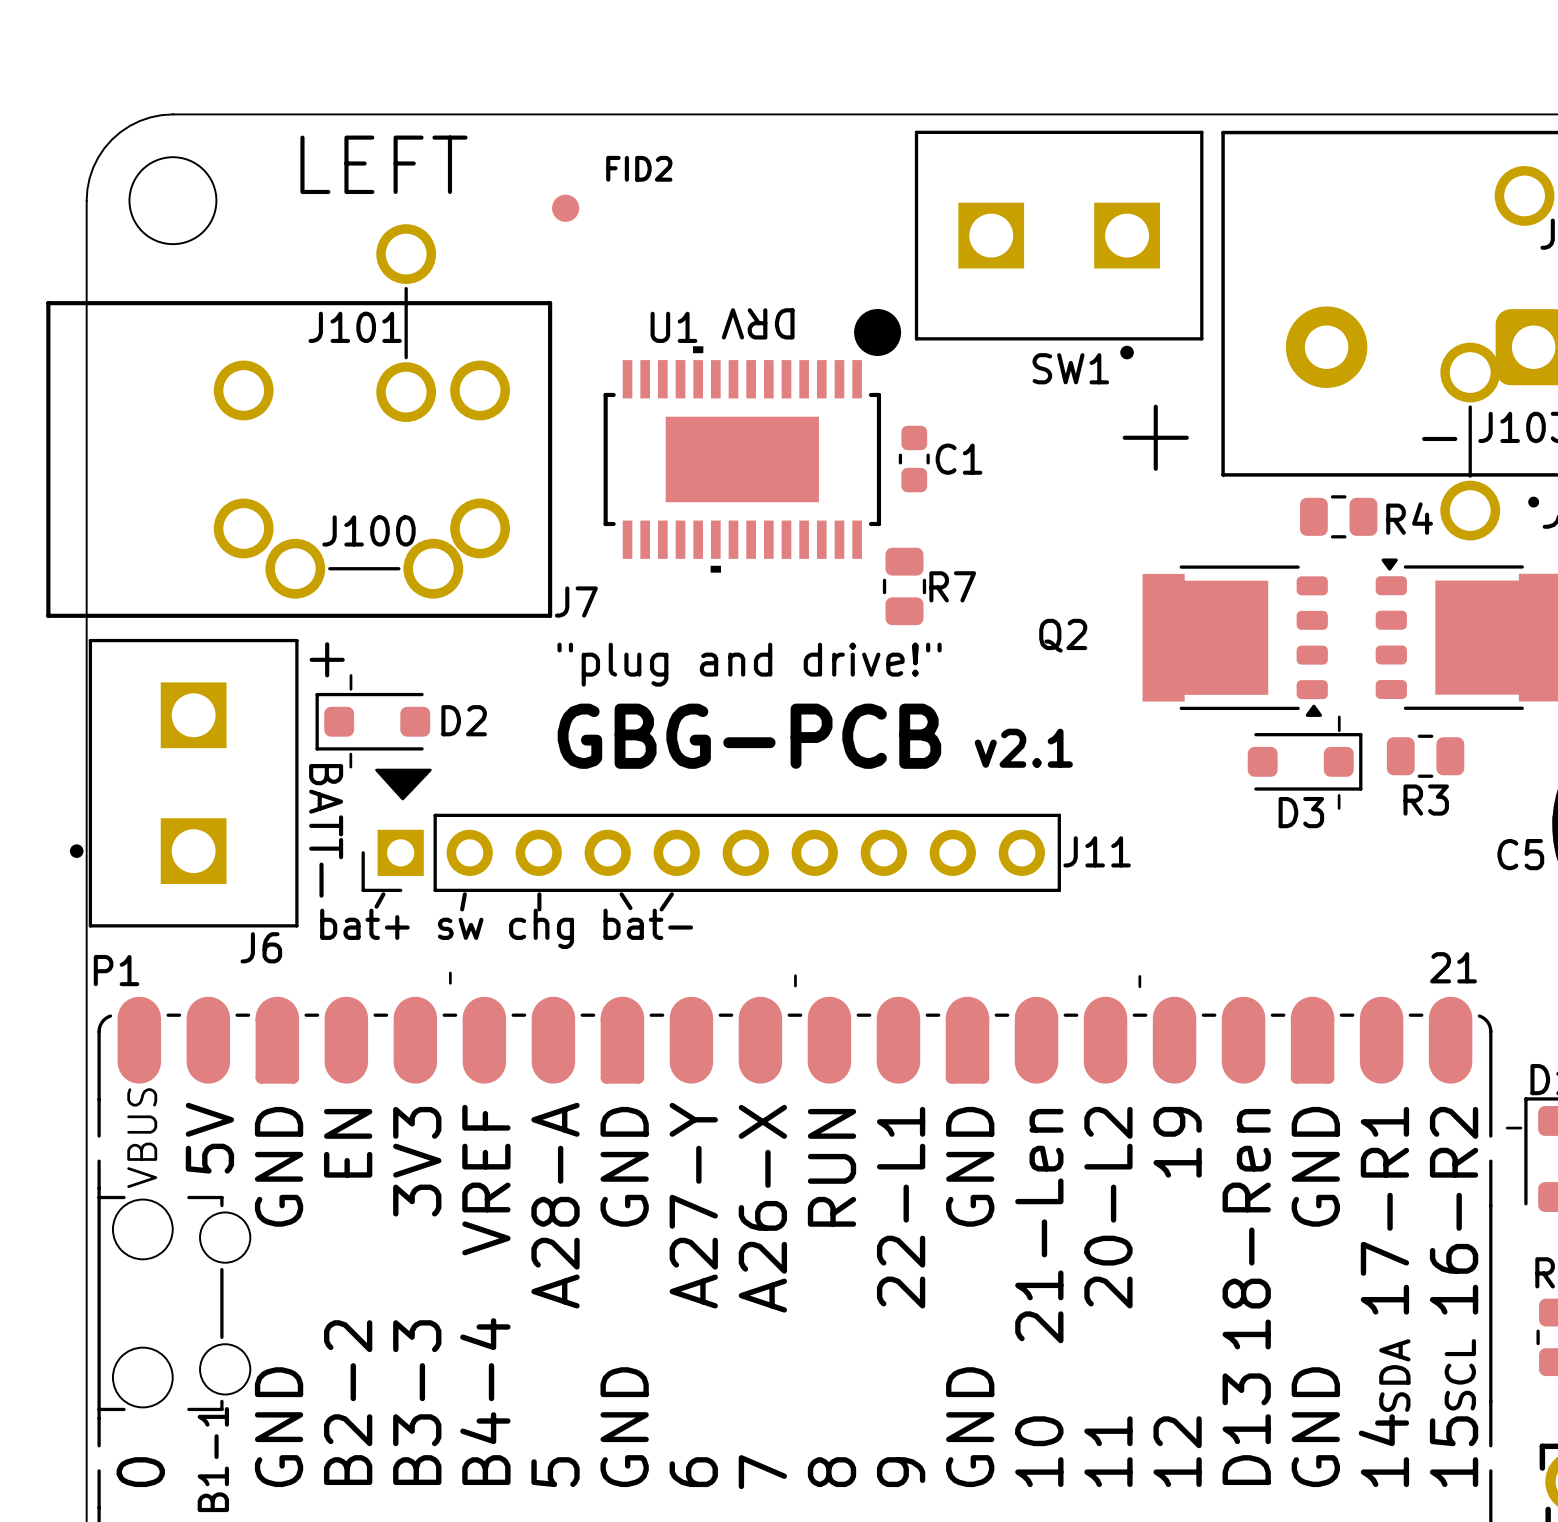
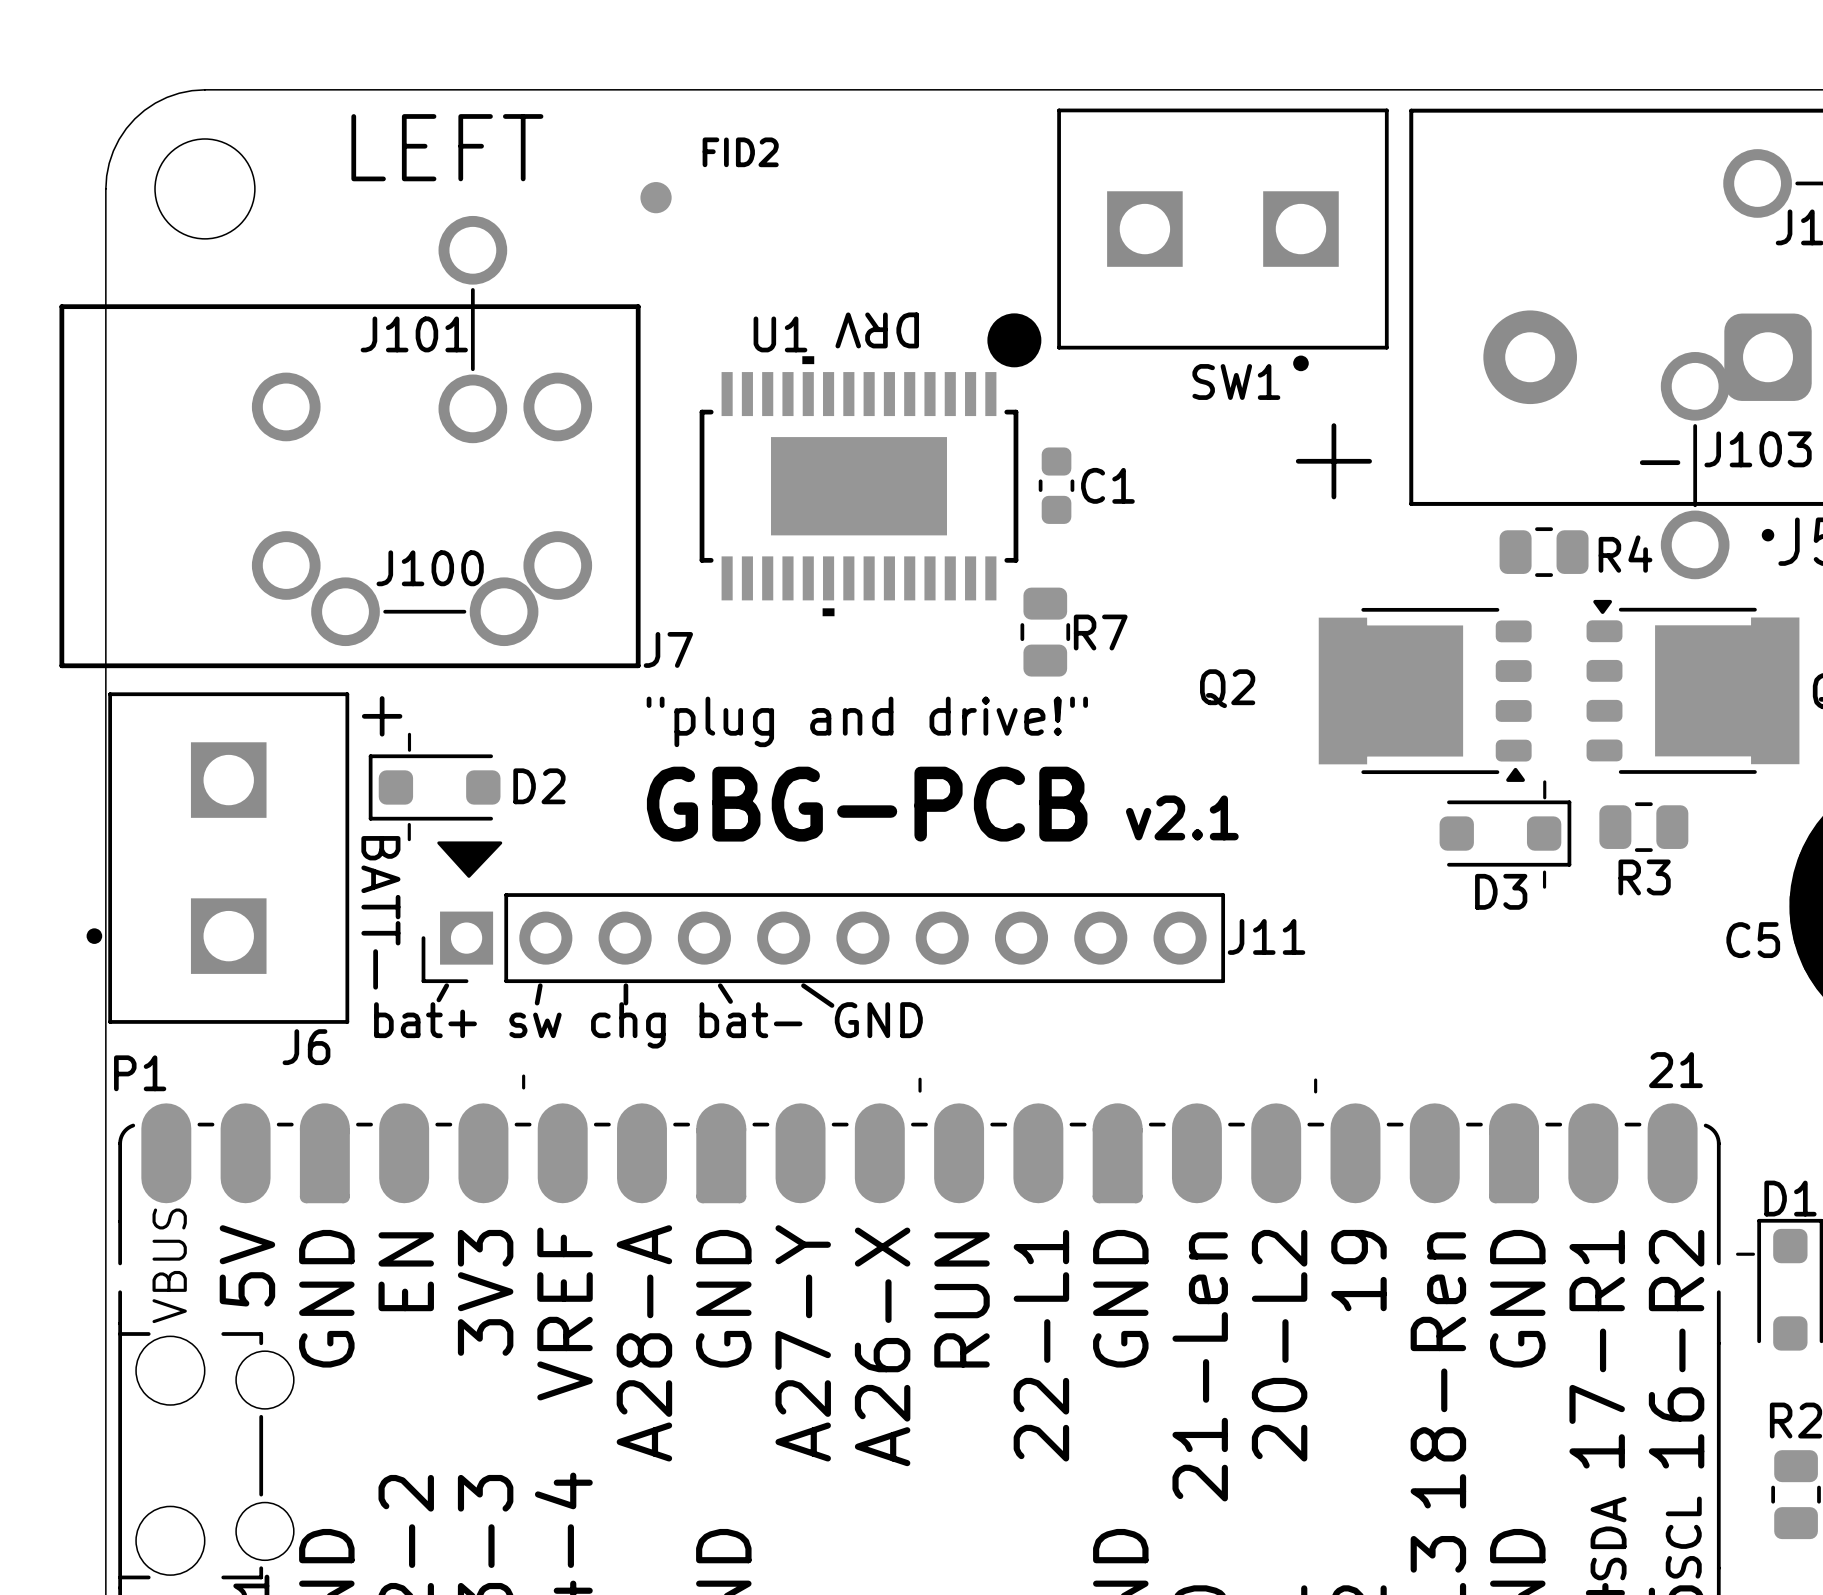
line: (671, 894) (661, 909) -> none
line: none -> (803, 985) (832, 1005)
text: bat+ sw chg bat- (506, 928) -> bat+ sw chg bat- GND (648, 1025)

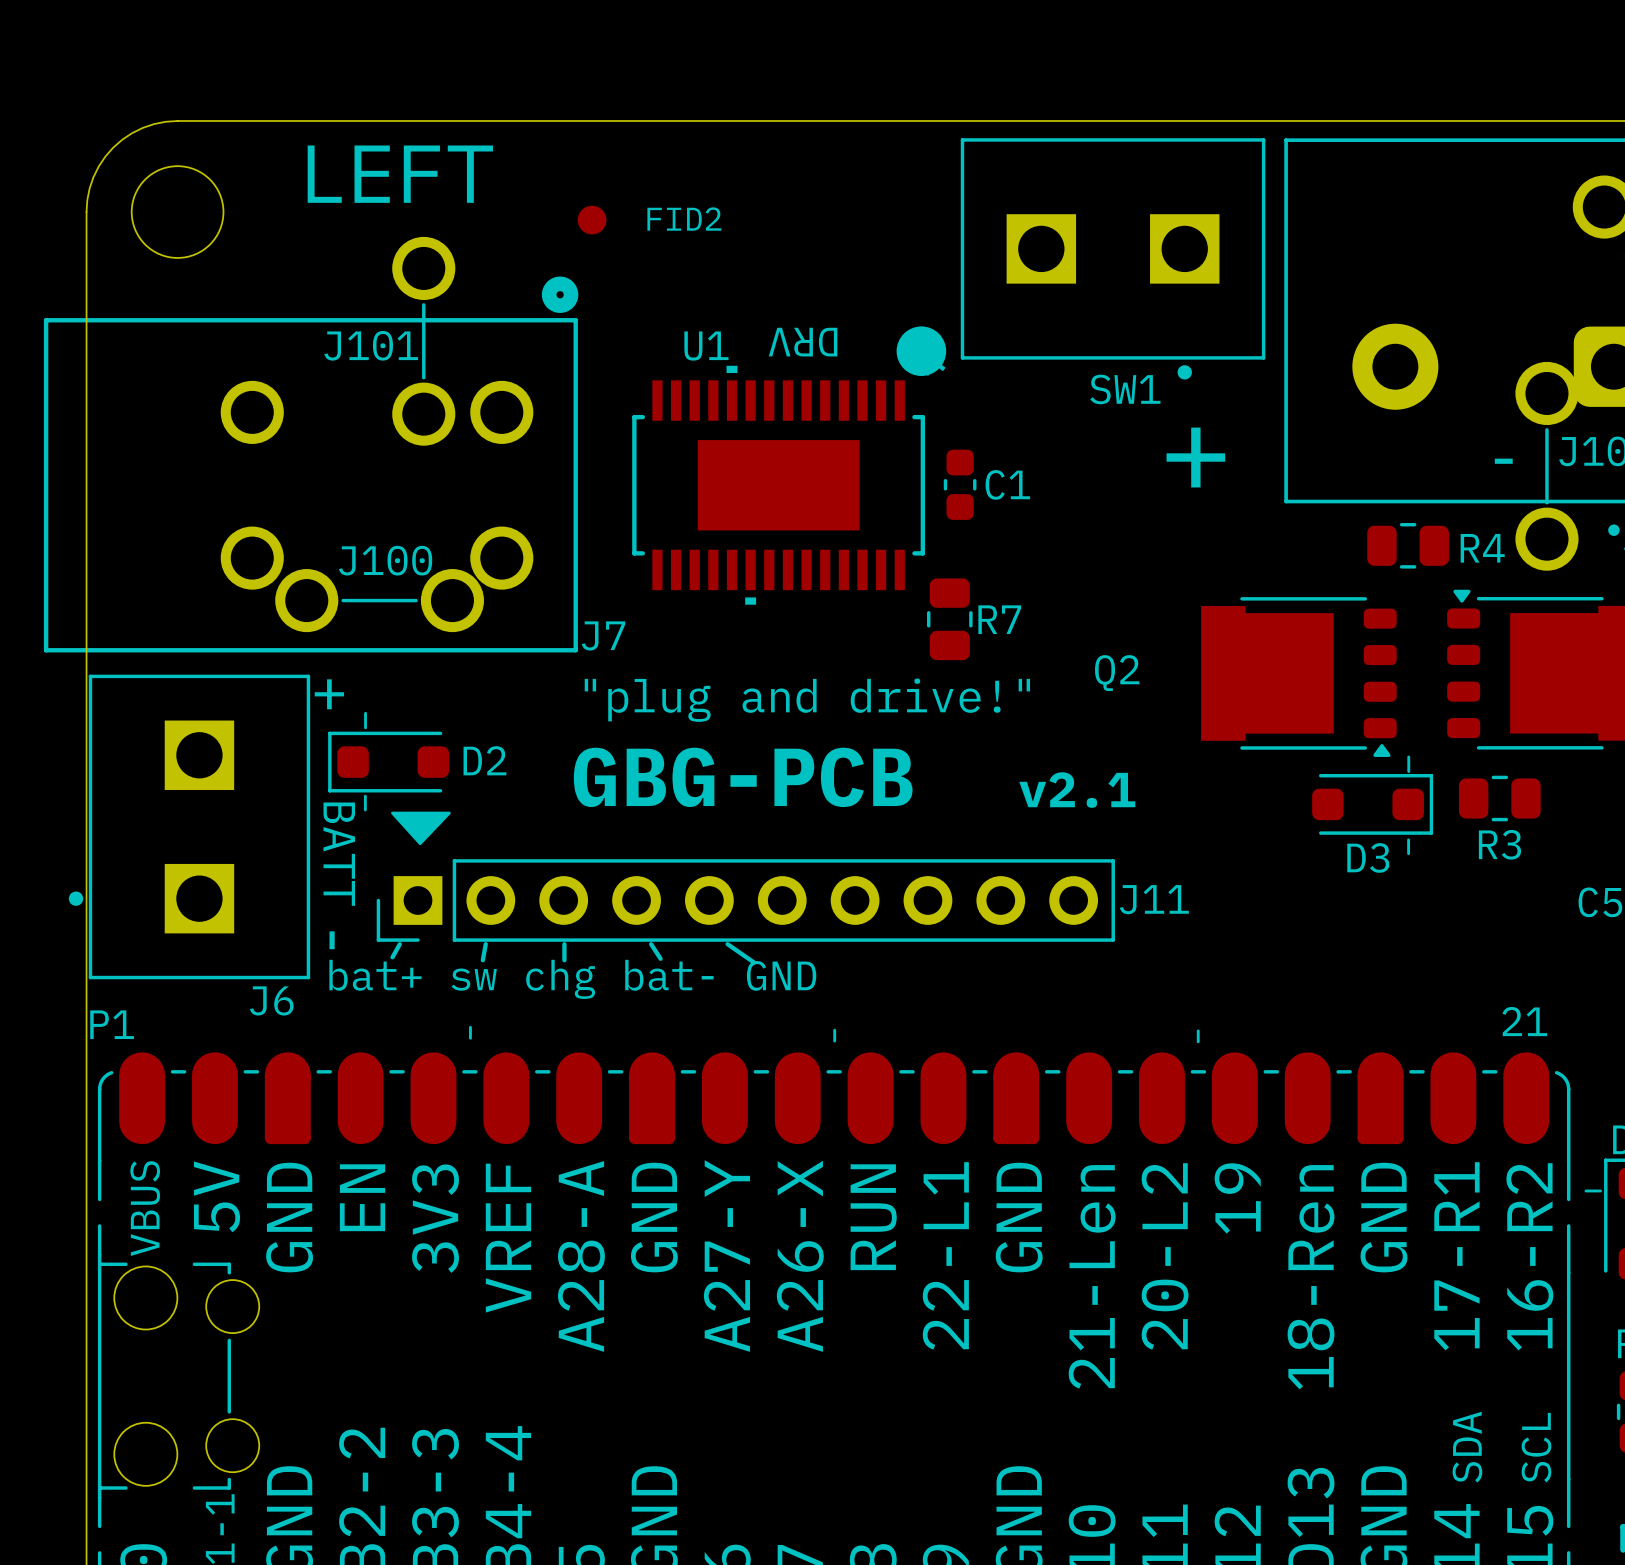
FID2 name position: FID2 (740, 152) -> FID2 (684, 219)
J7 footprint: [59, 304, 641, 669] -> [43, 276, 579, 653]

